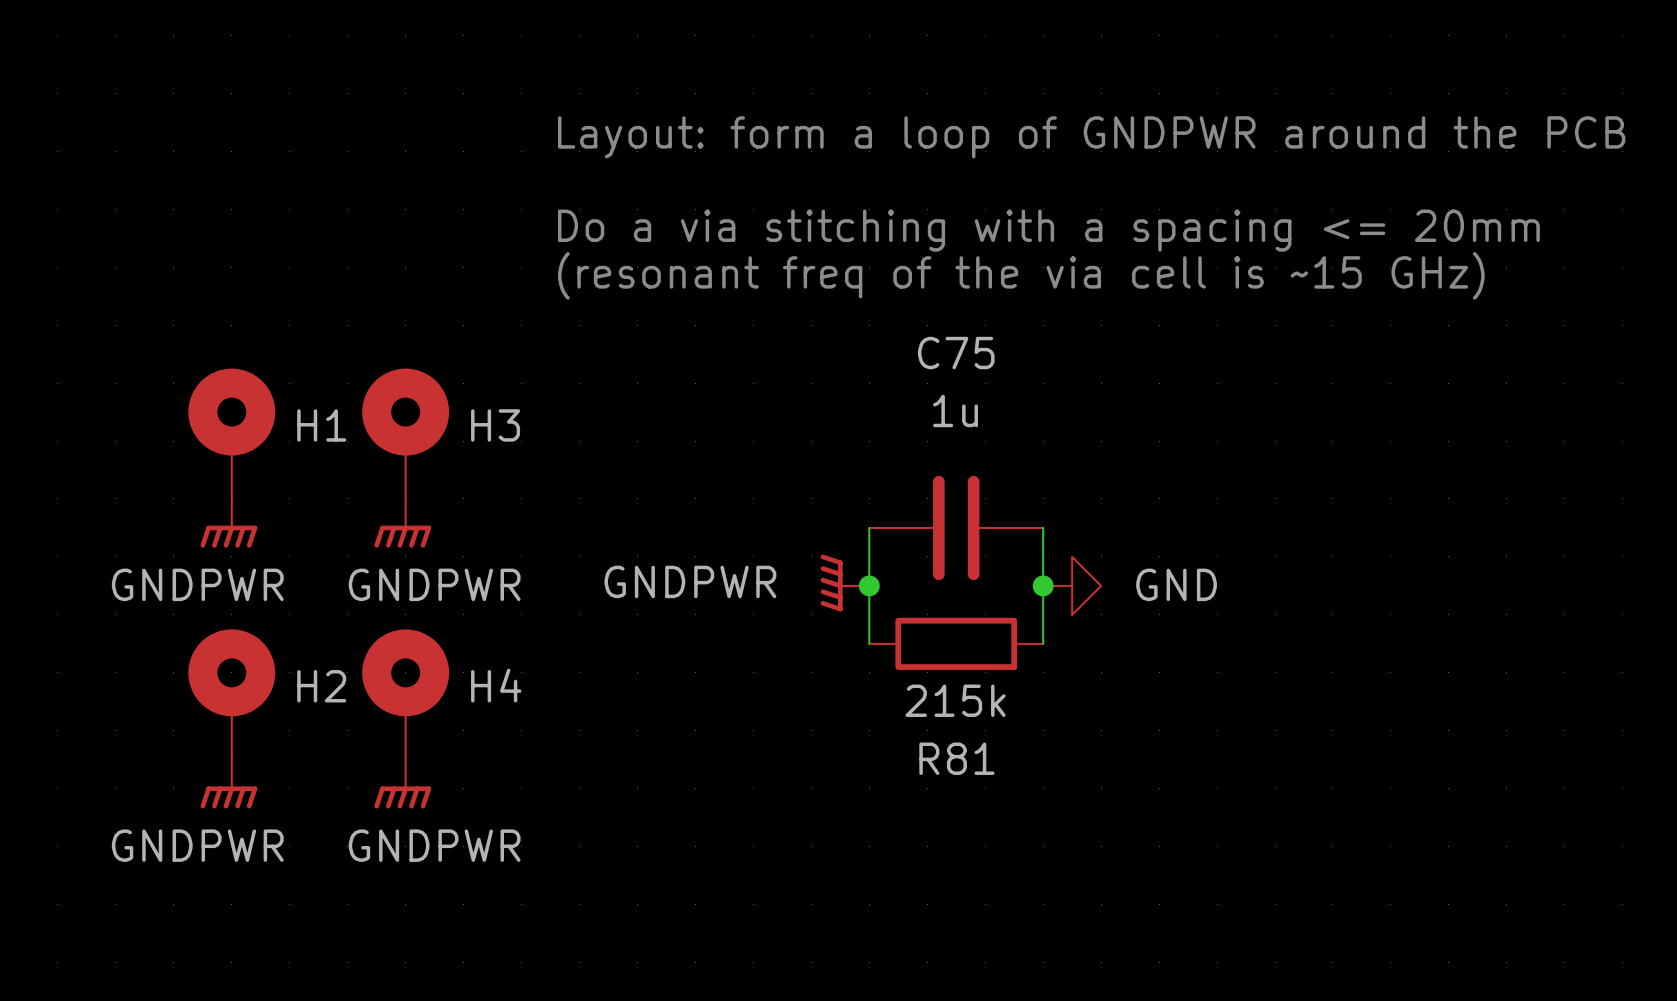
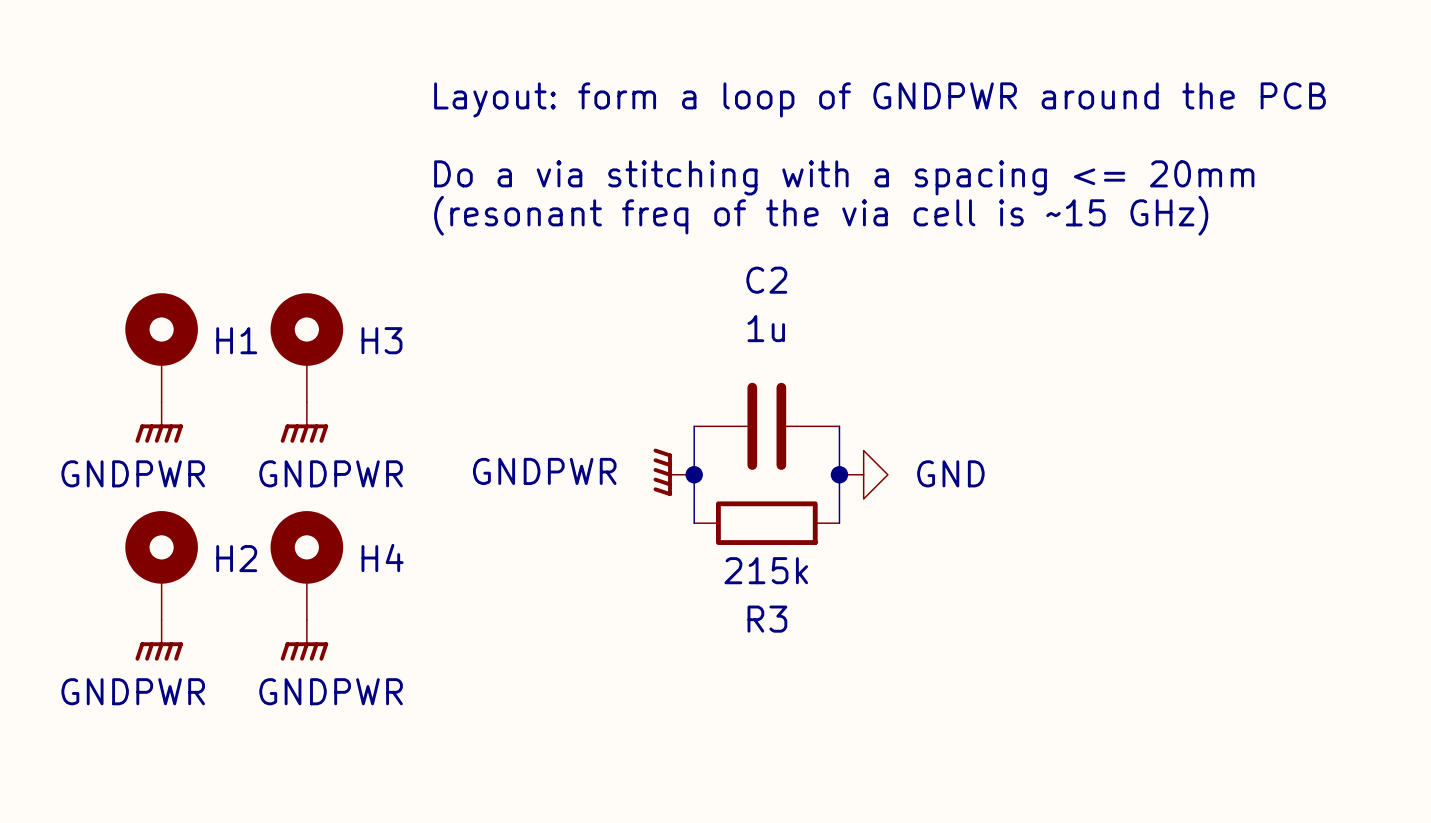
C75 name: C75 (956, 353) -> C2 (766, 280)
R81 name: R81 (956, 758) -> R3 (767, 619)

